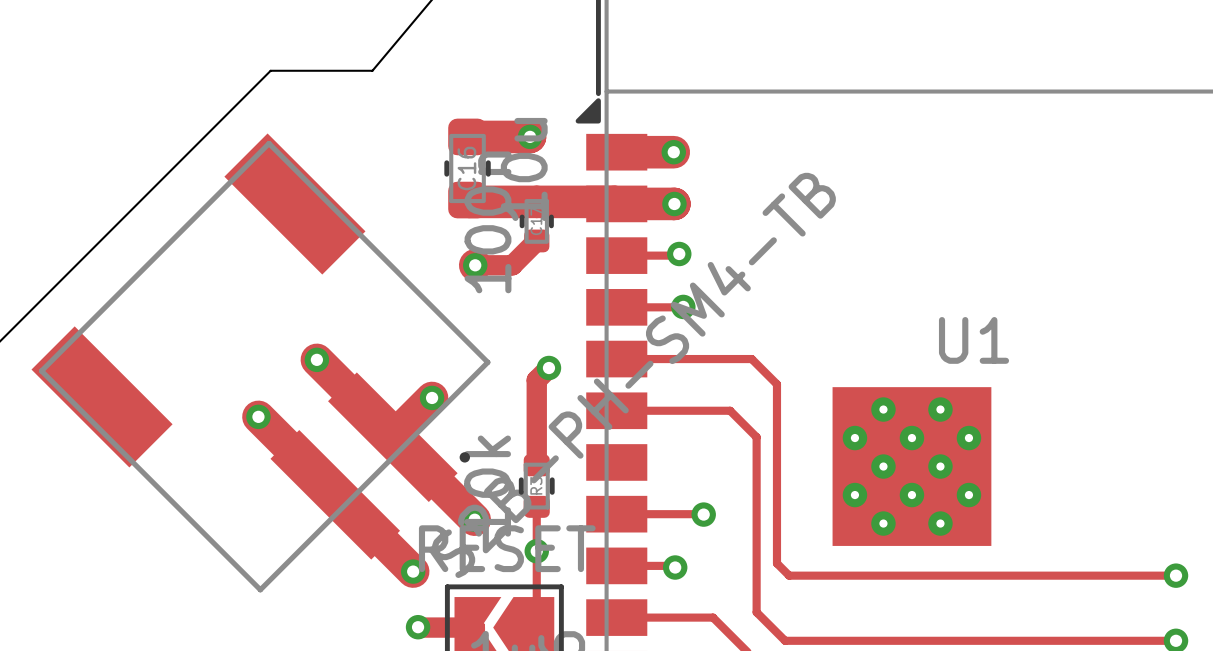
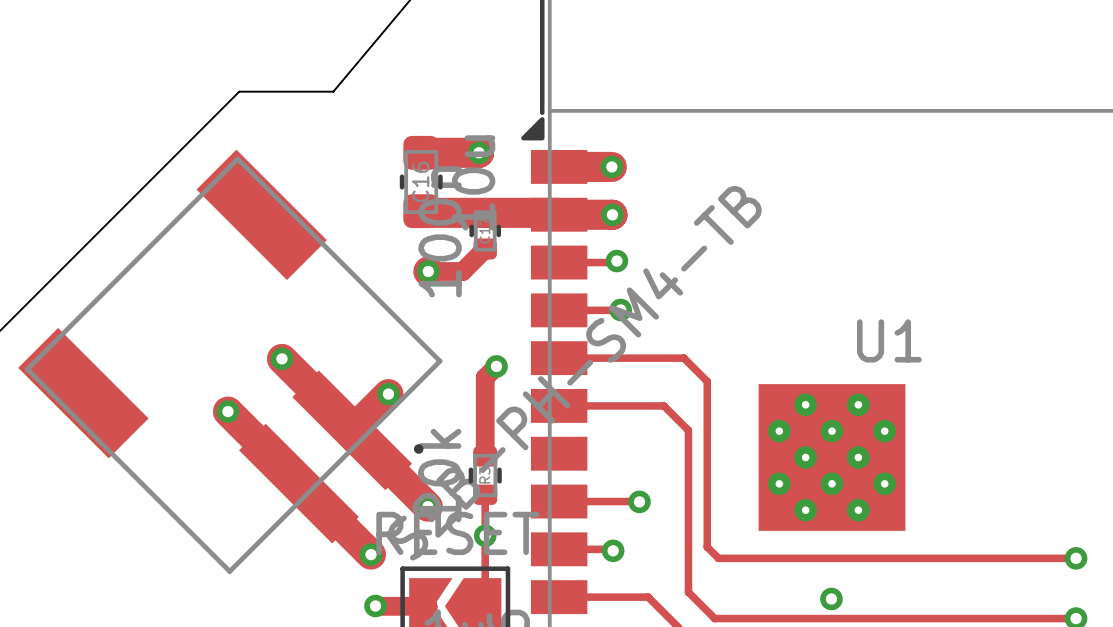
via: none -> (831, 599)

